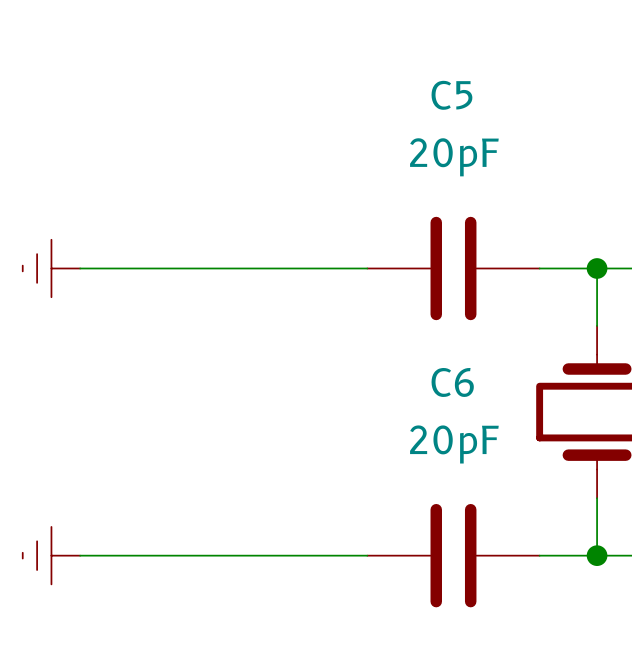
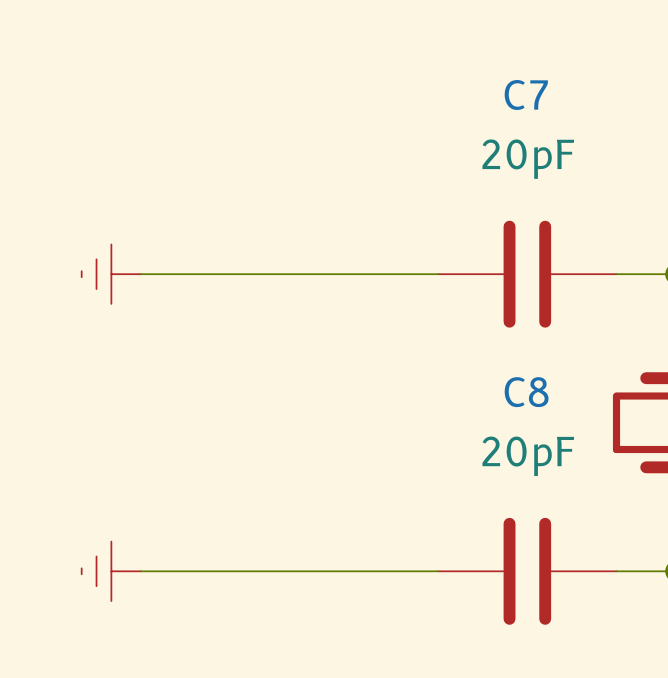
C5 name: C5 (451, 95) -> C7 (526, 94)
C6 name: C6 (452, 382) -> C8 (526, 392)

